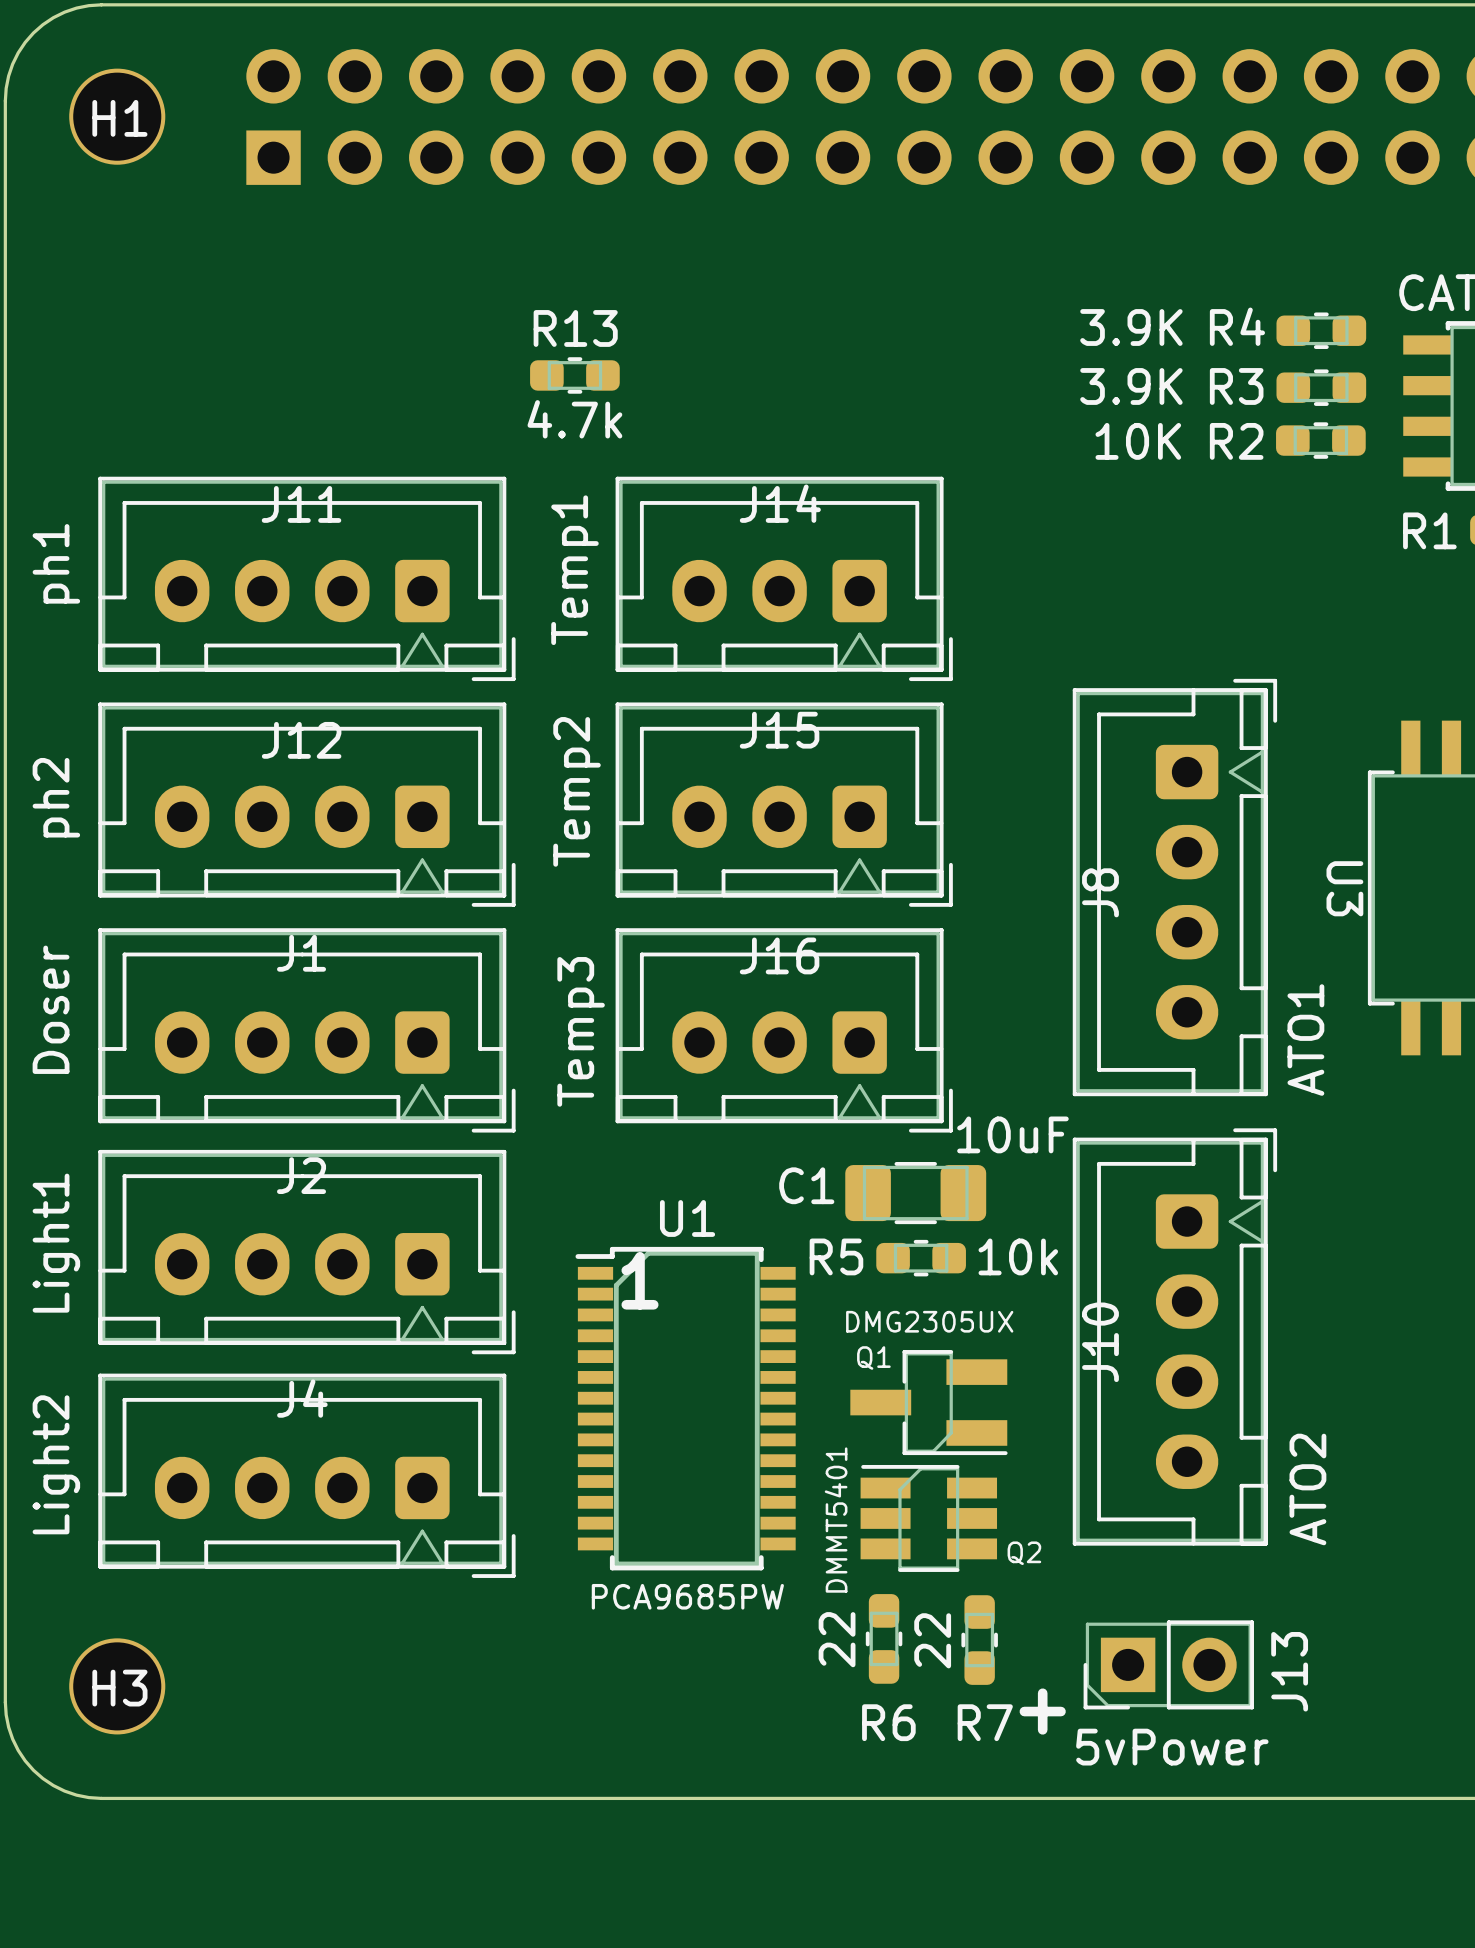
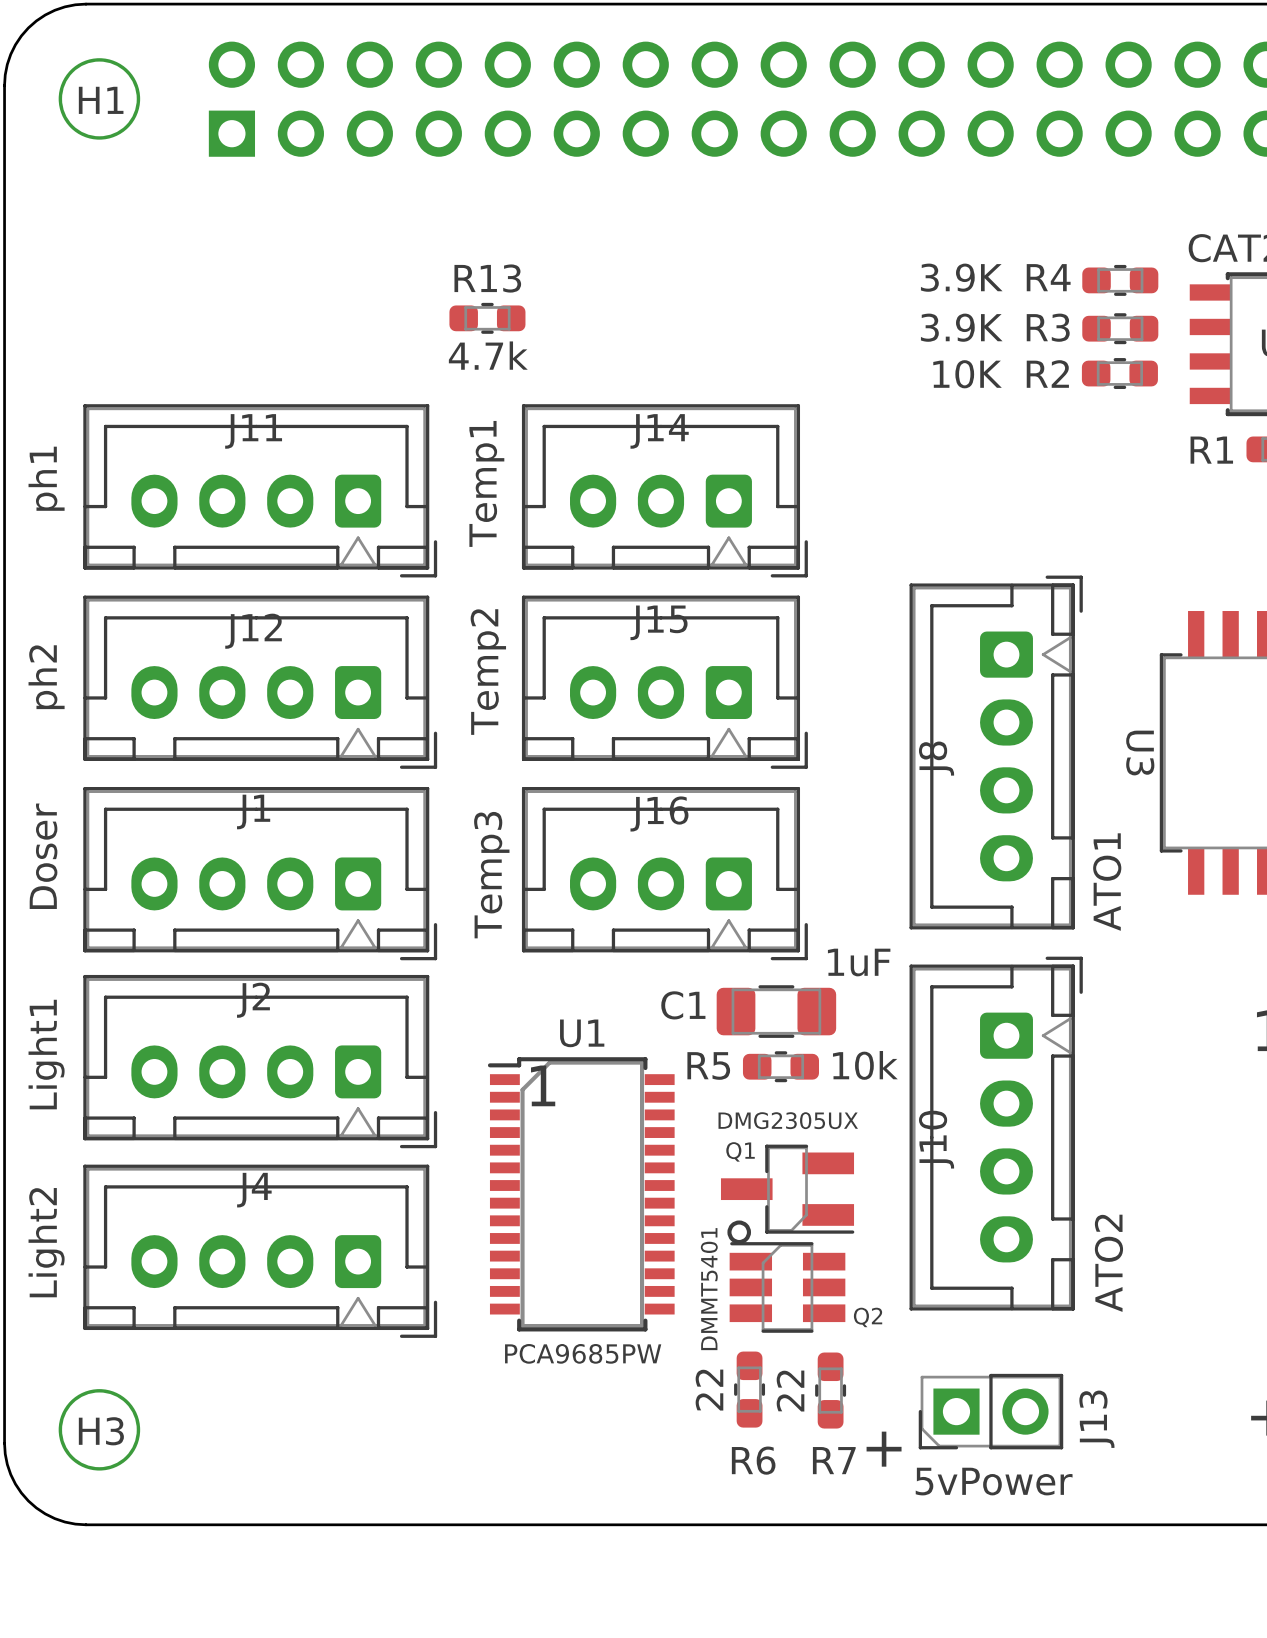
C1 value: 10uF (1012, 1134) -> 1uF (859, 962)
drawing: none -> [727, 1220, 752, 1245]

